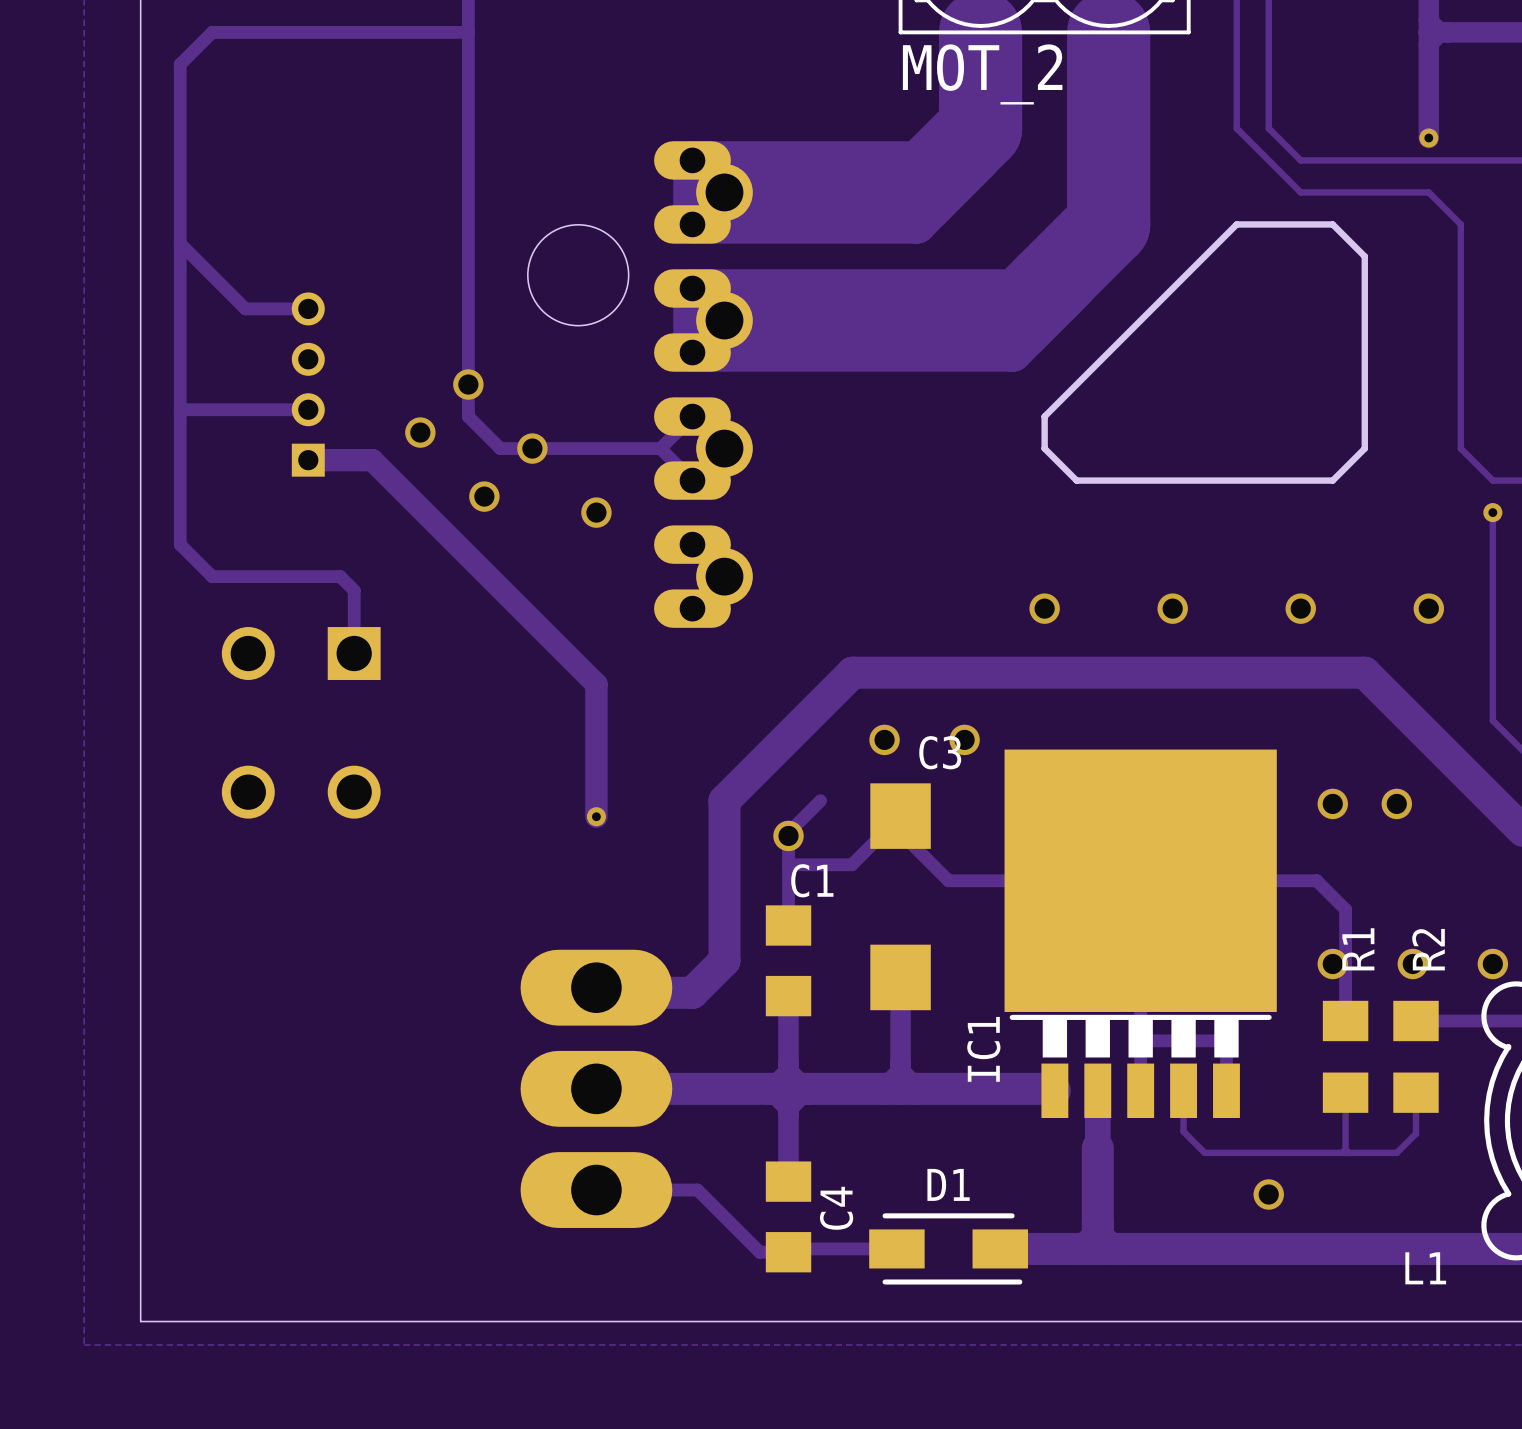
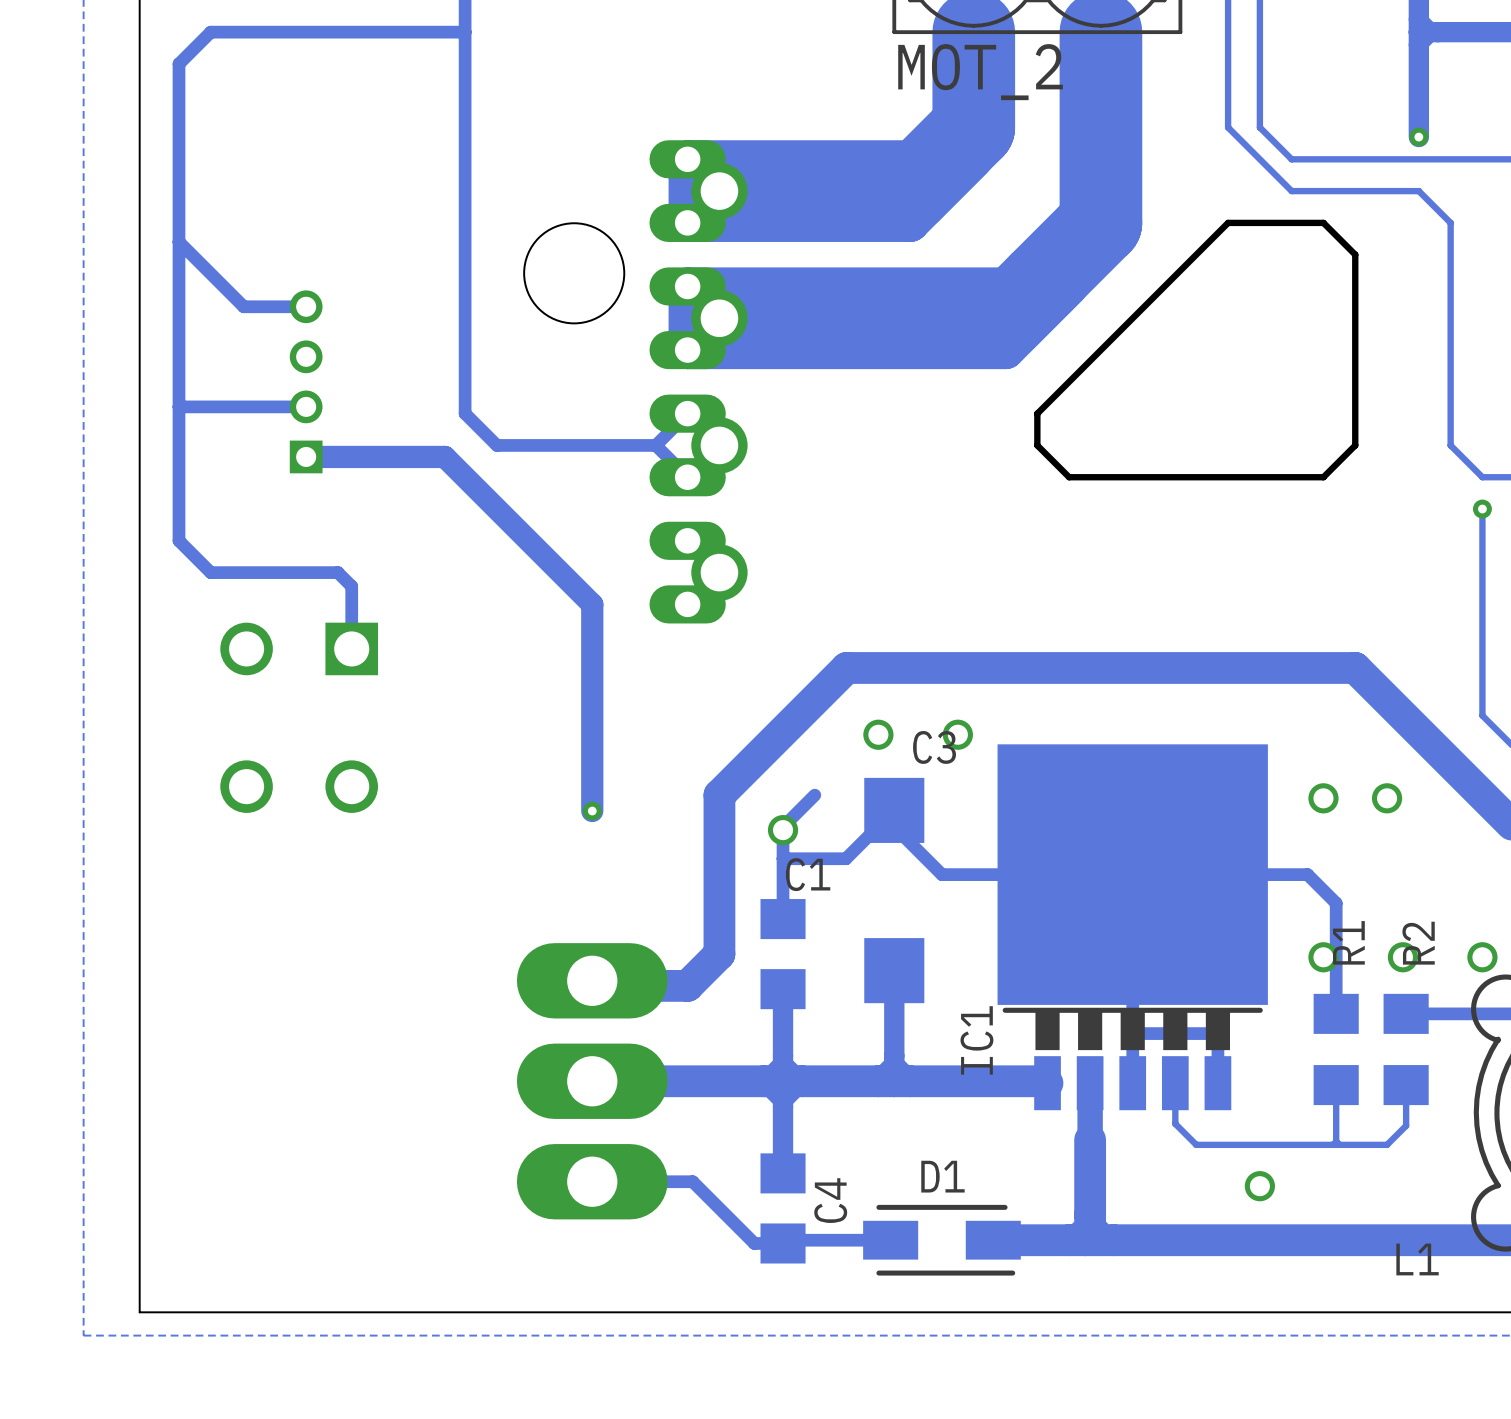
via: (468, 384) -> none
via: (420, 432) -> none
via: (532, 448) -> none
track: (372, 460) (596, 684) -> (369, 456) (444, 456) (592, 604) (592, 679)
via: (484, 496) -> none
via: (596, 512) -> none
via: (1044, 608) -> none
via: (1172, 608) -> none
via: (1300, 608) -> none
via: (1428, 608) -> none

